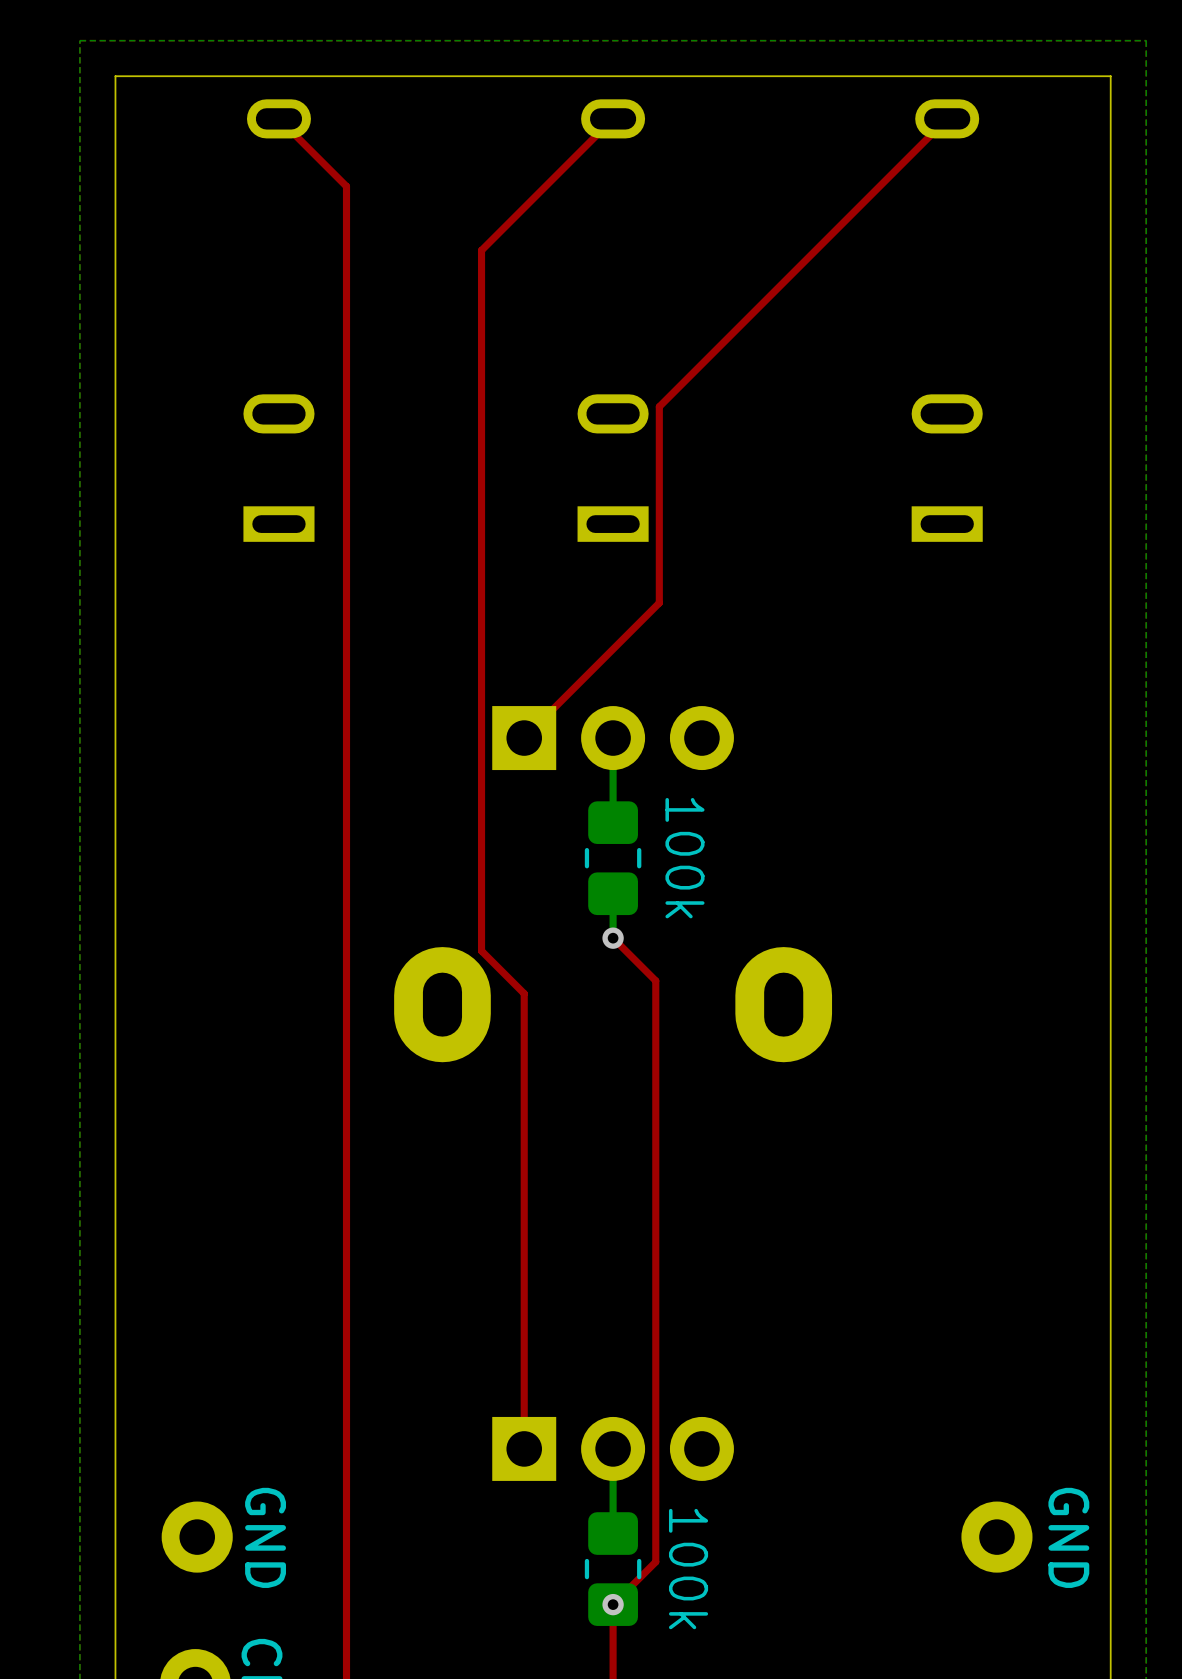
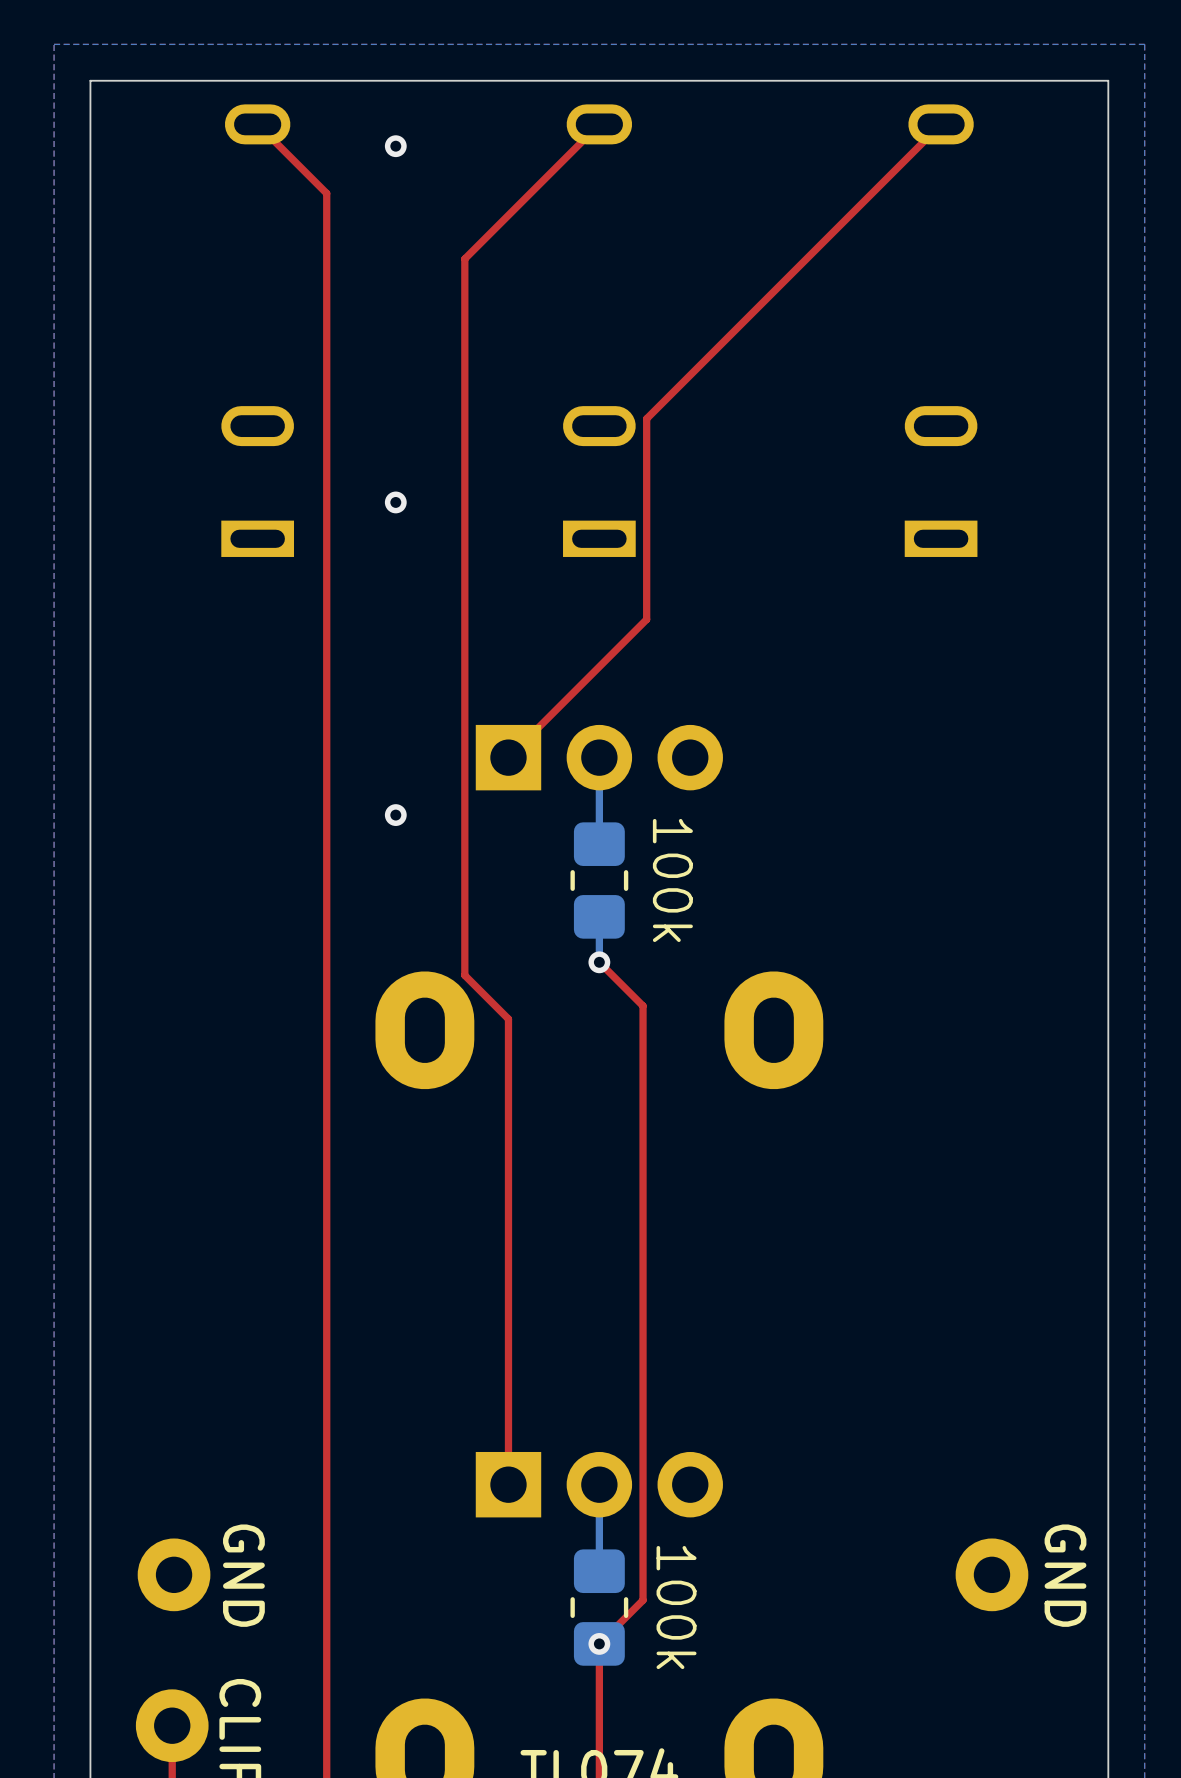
via: none -> (395, 146)
via: none -> (395, 502)
via: none -> (395, 815)

